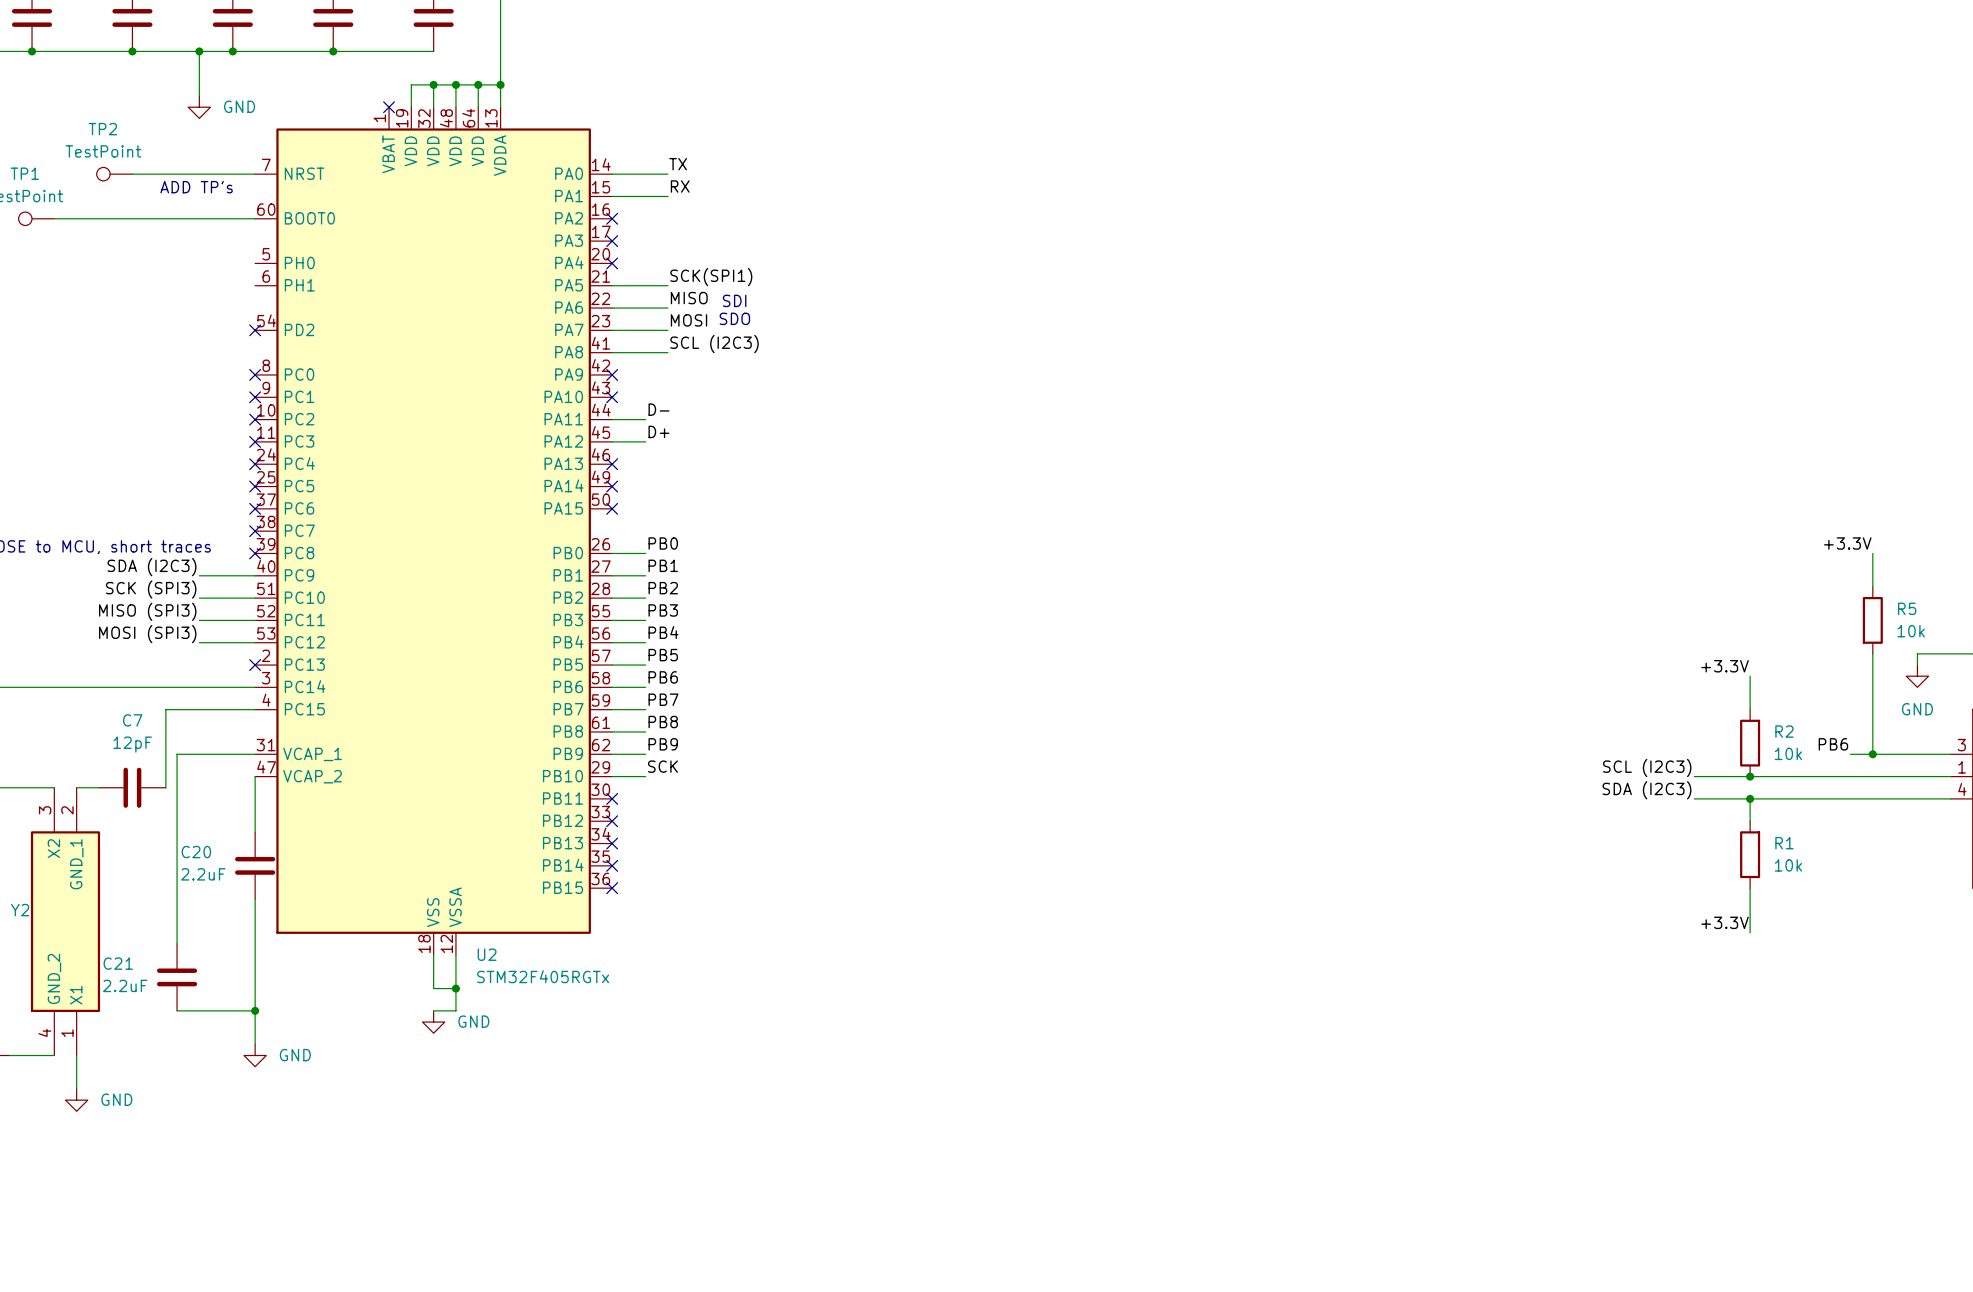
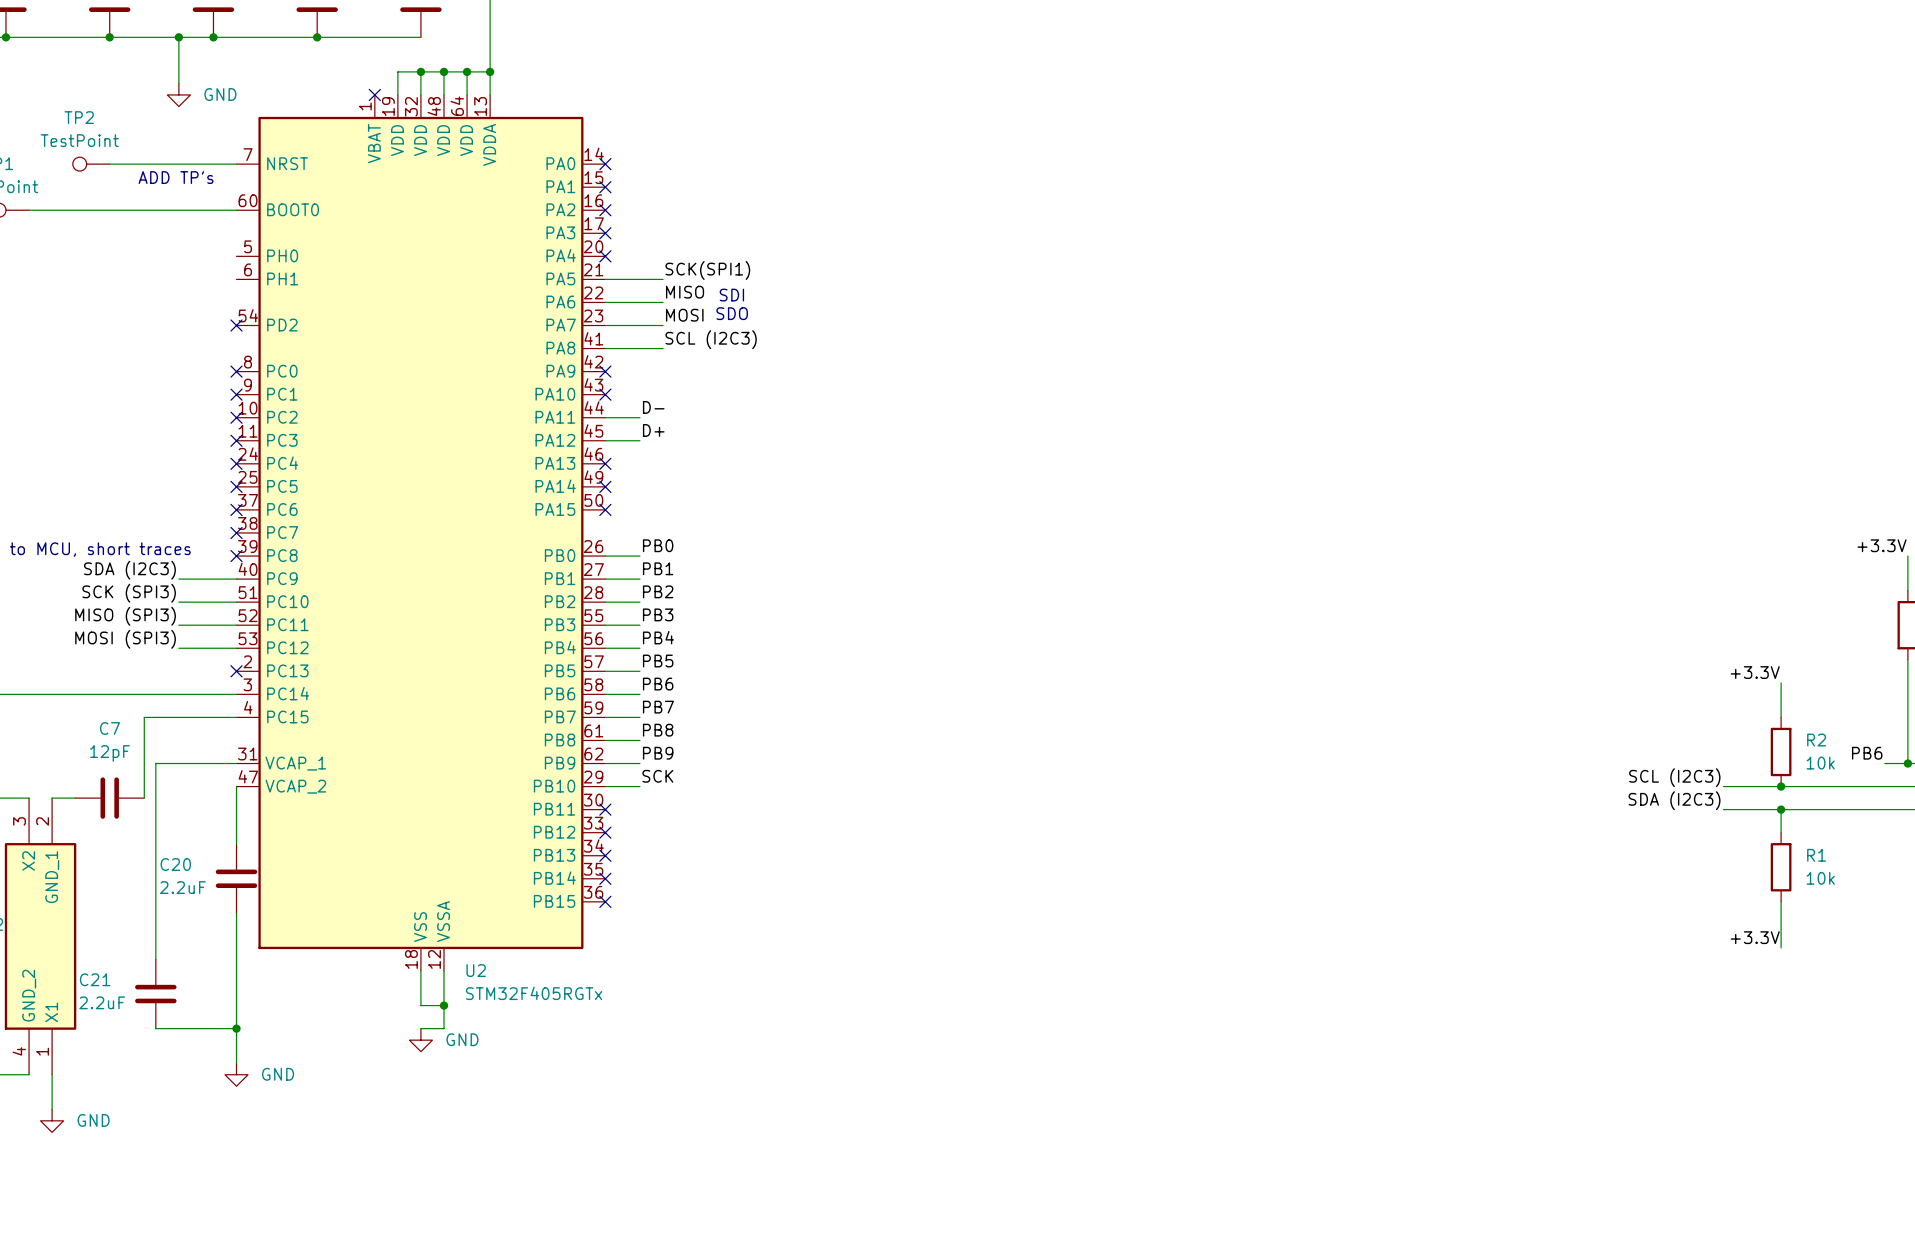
label: TX (678, 164) -> none
wire: (612, 174) (667, 174) -> none
no-connect mark: none -> (605, 164)
label: RX (680, 186) -> none
wire: (612, 196) (667, 196) -> none
no-connect mark: none -> (605, 187)

